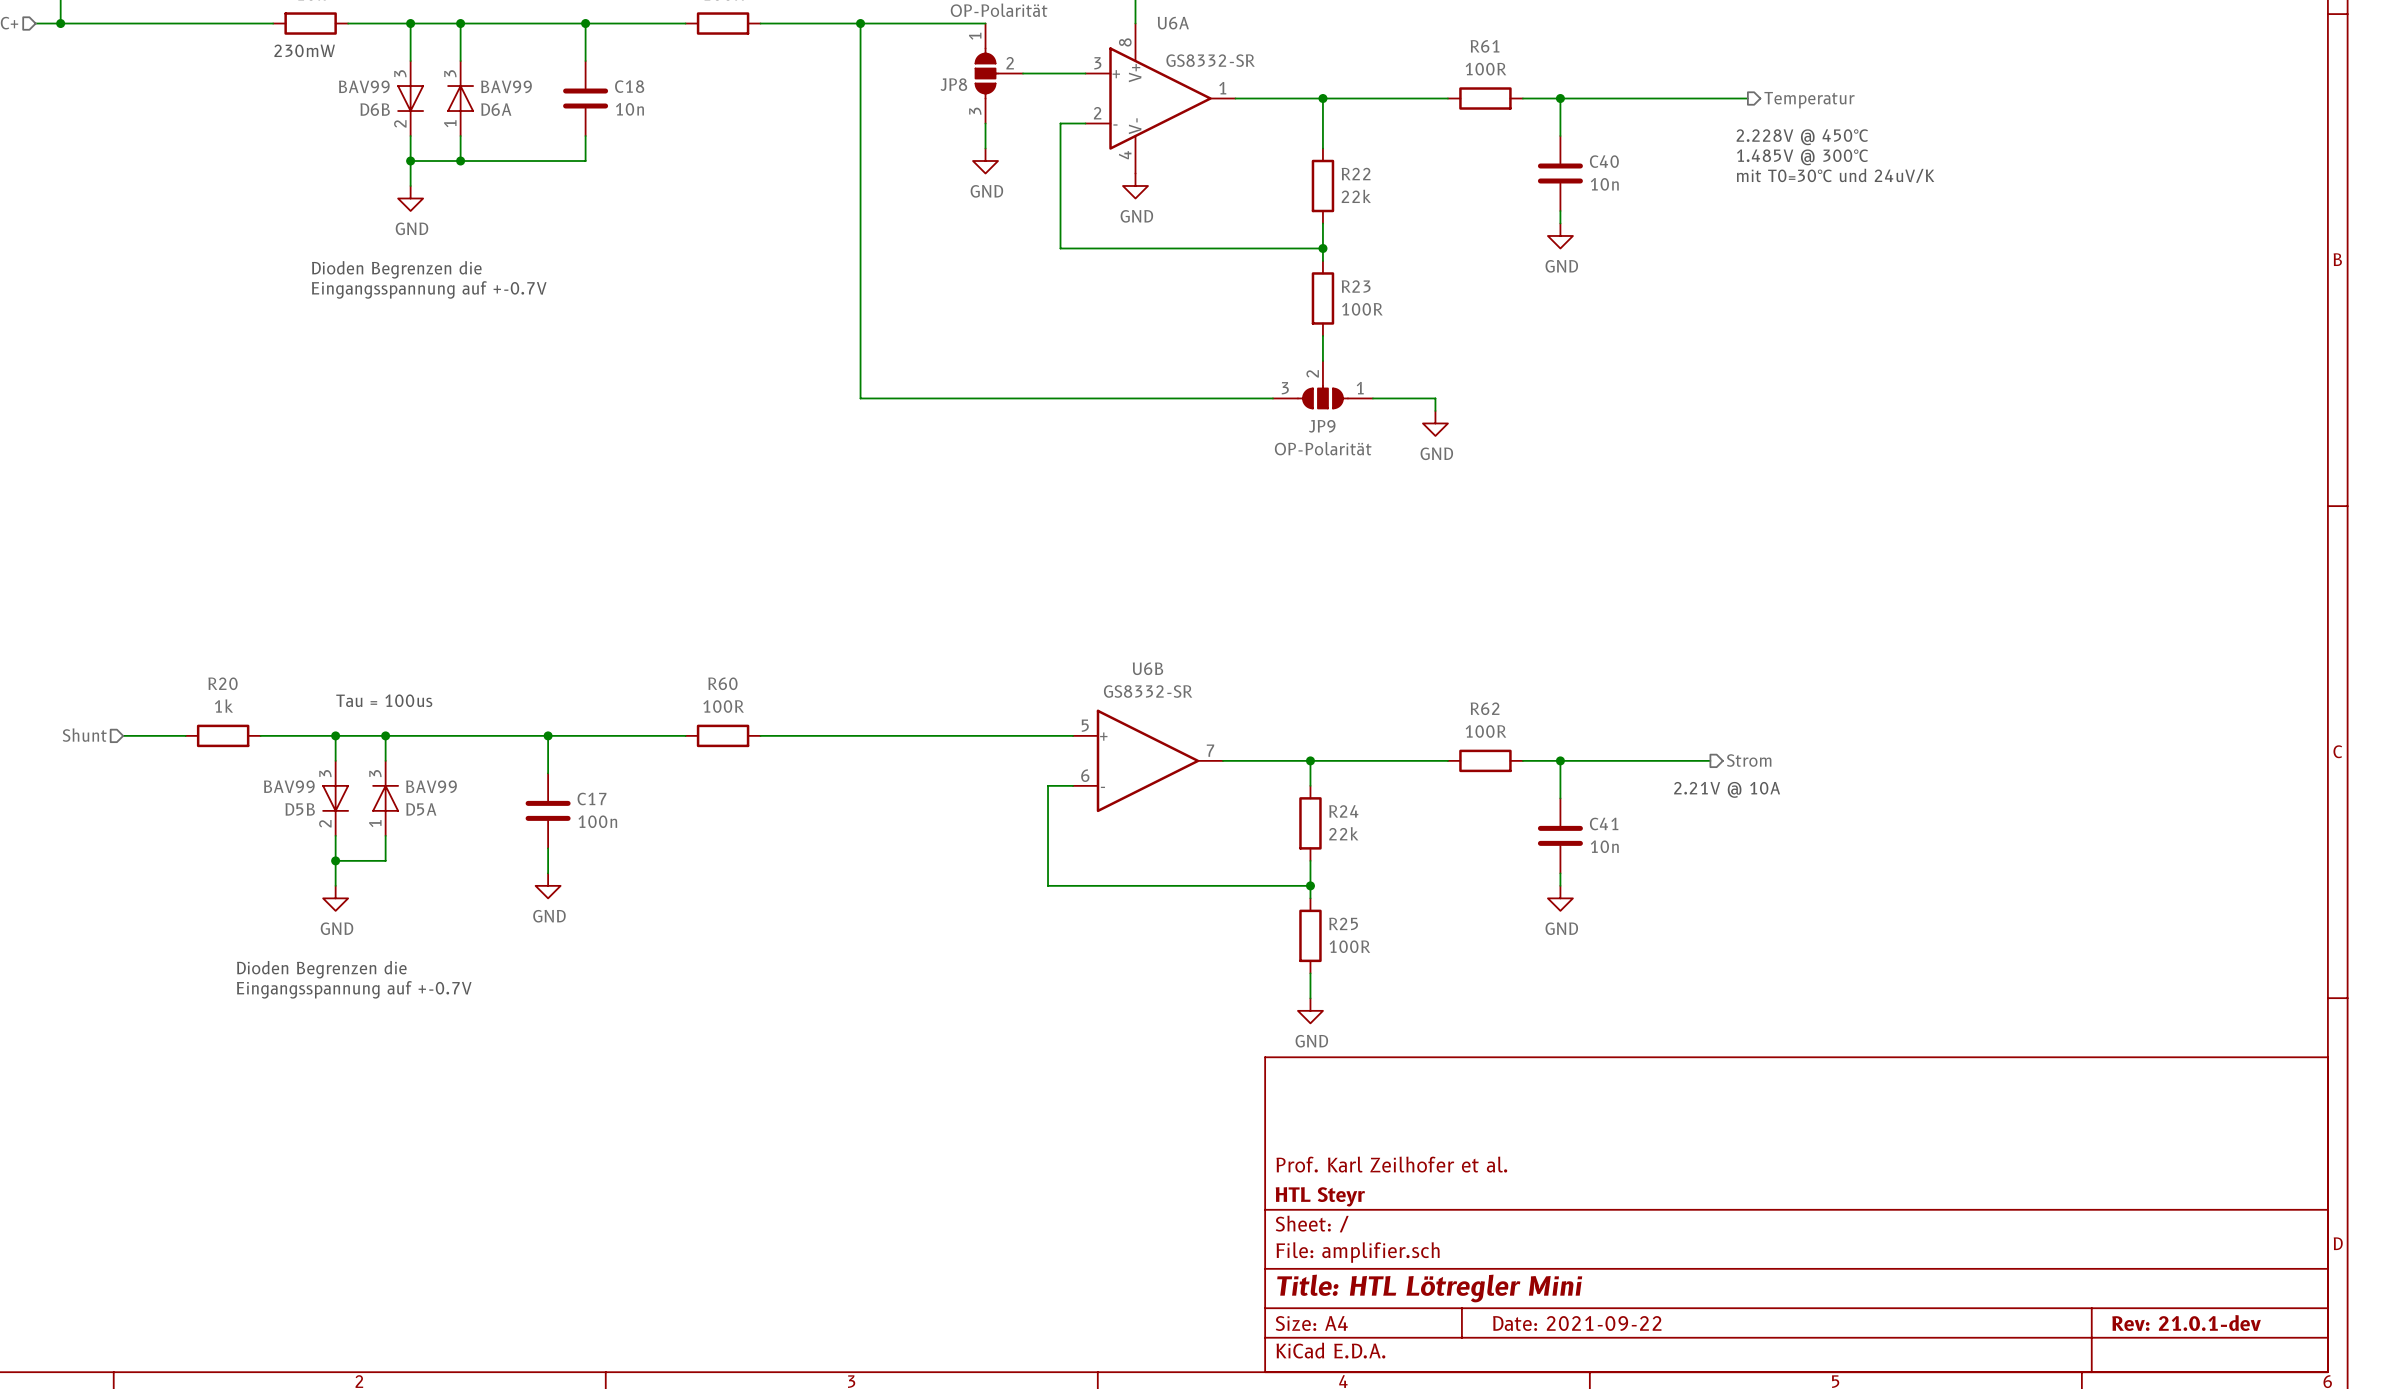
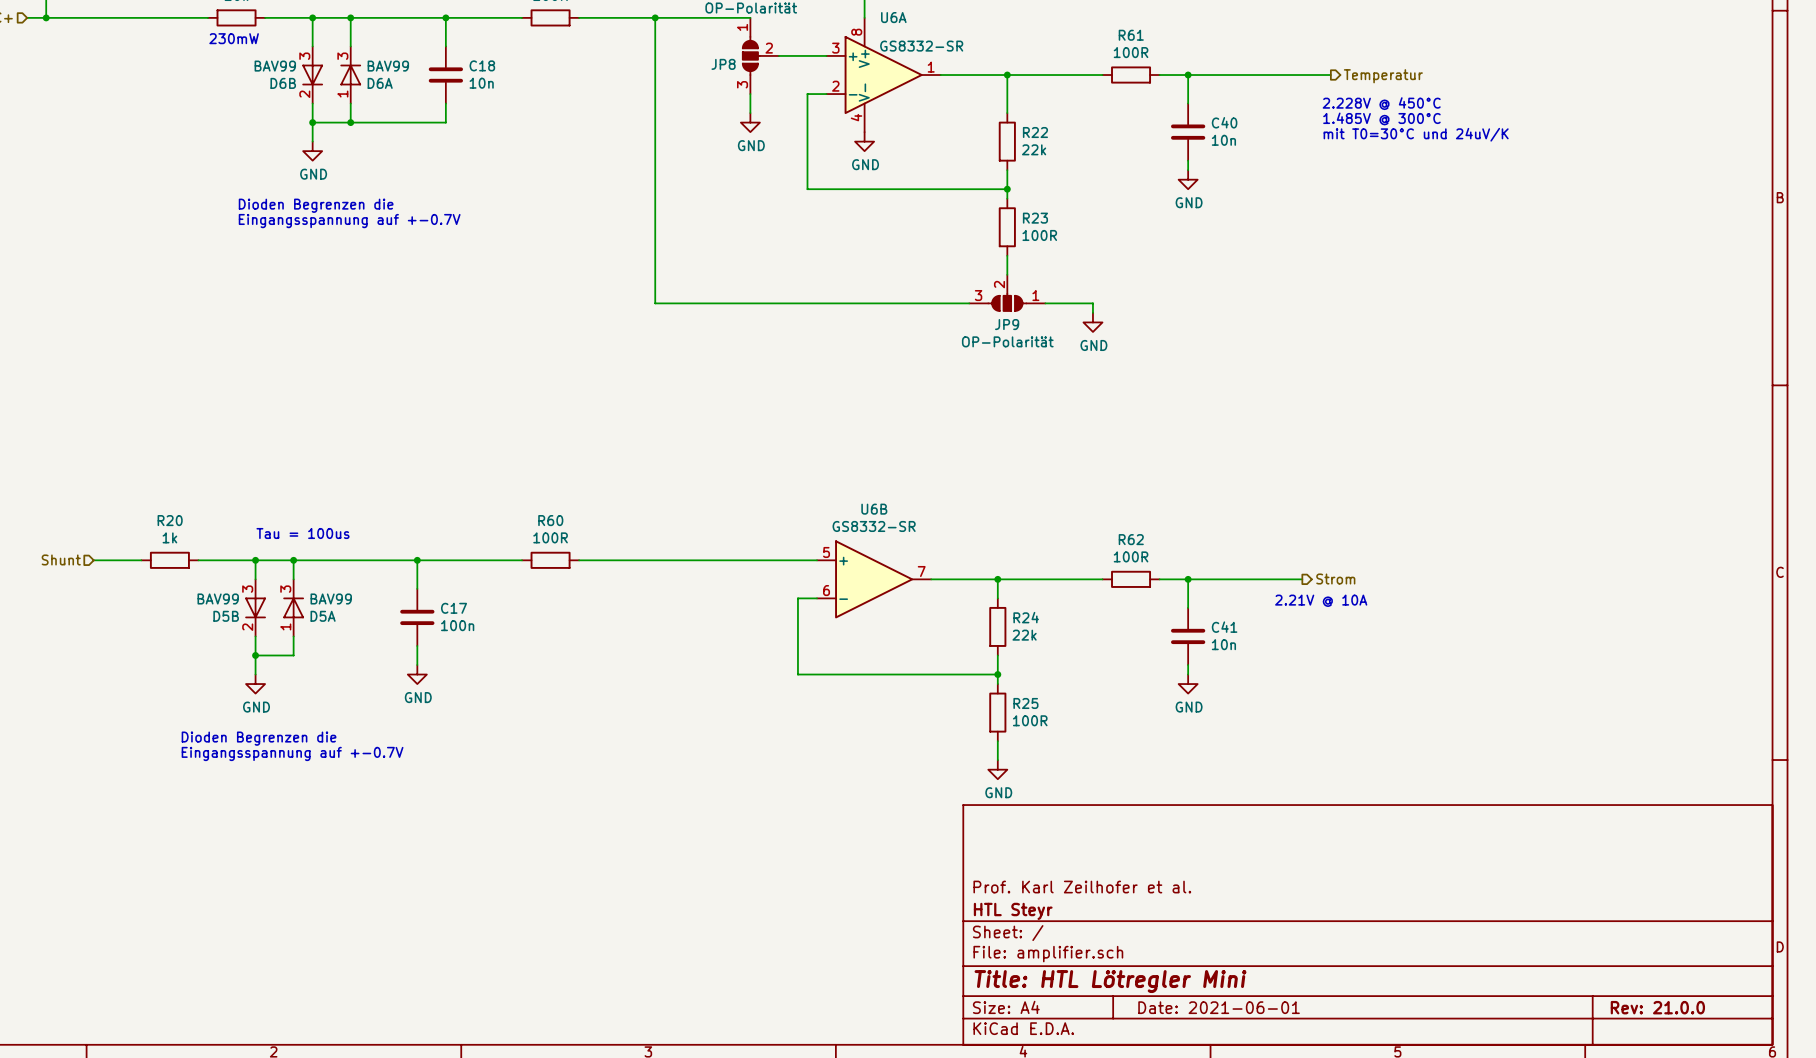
title block: Date: 2021-09-22 (1577, 1323) -> Date: 2021-06-01 (1219, 1007)
title block: Rev: 21.0.1-dev (2186, 1323) -> Rev: 21.0.0 (1657, 1007)

